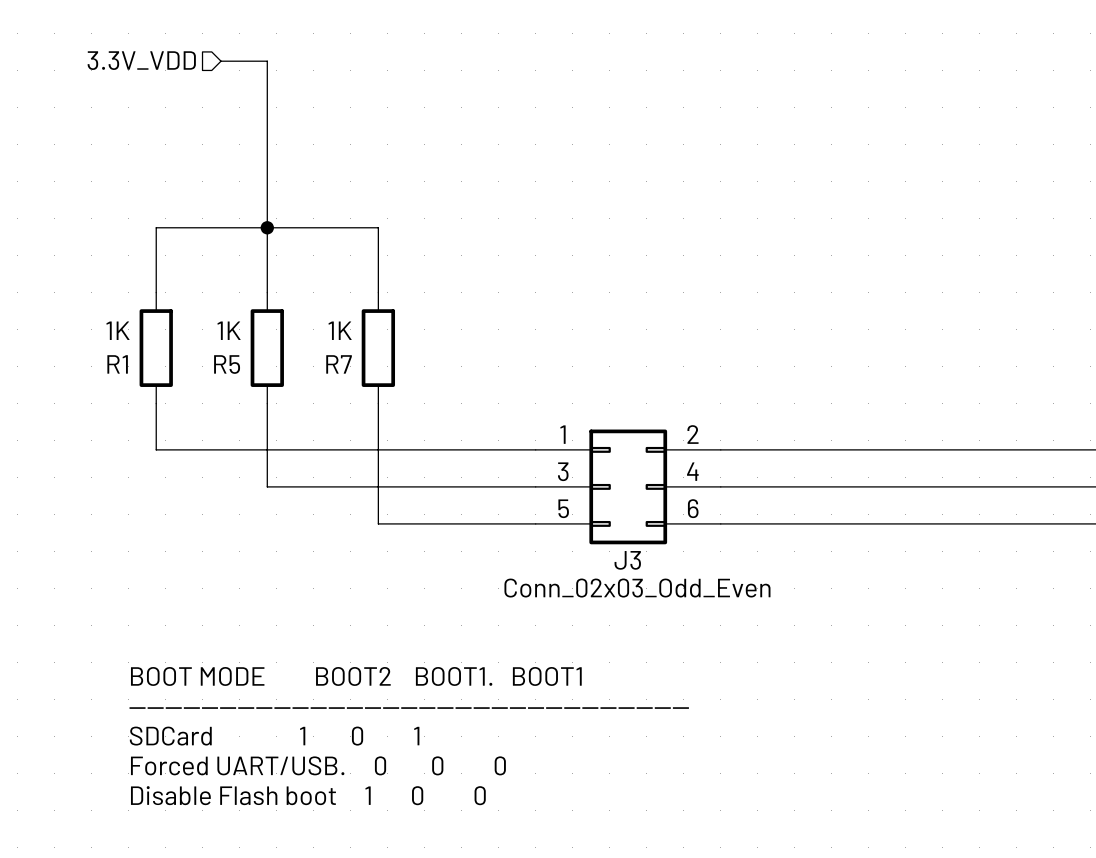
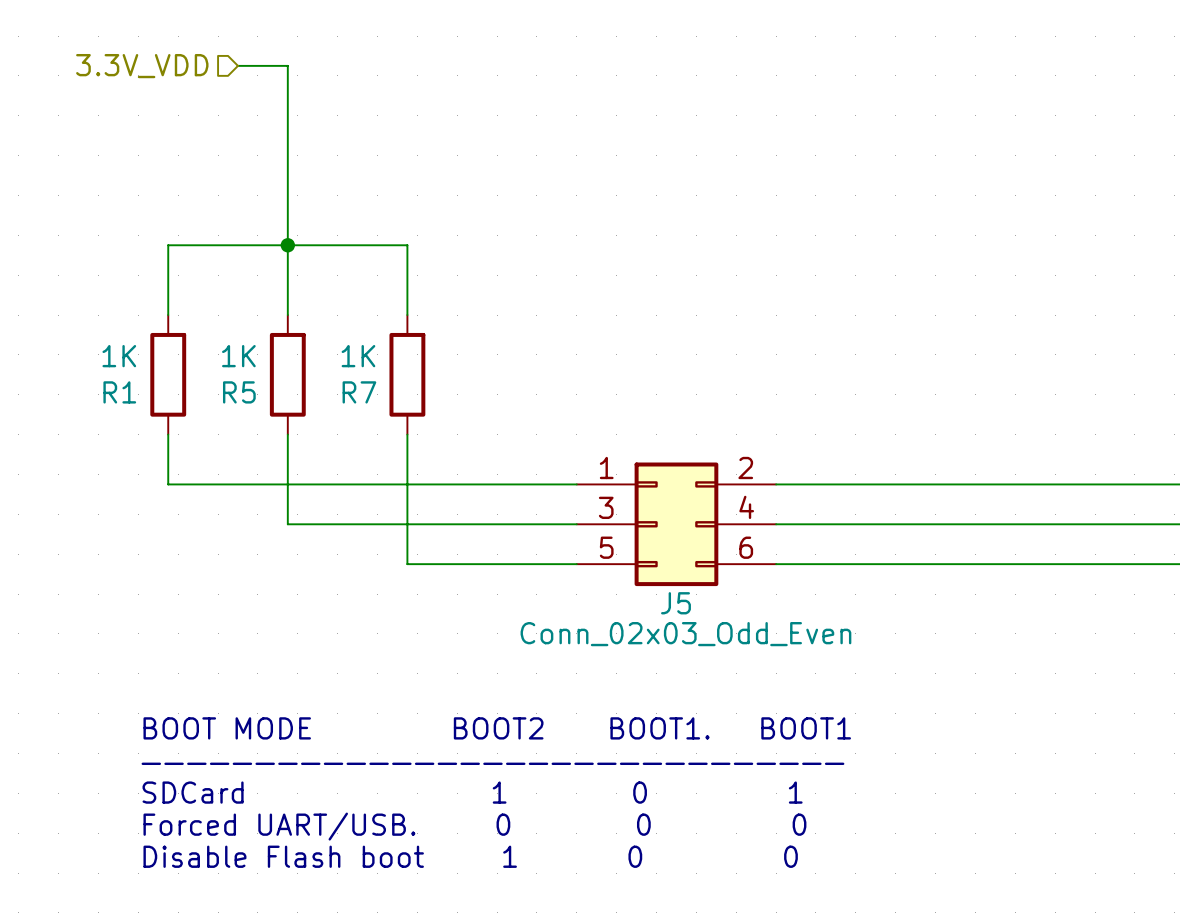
J3 name: J3 (627, 560) -> J5 (675, 603)

